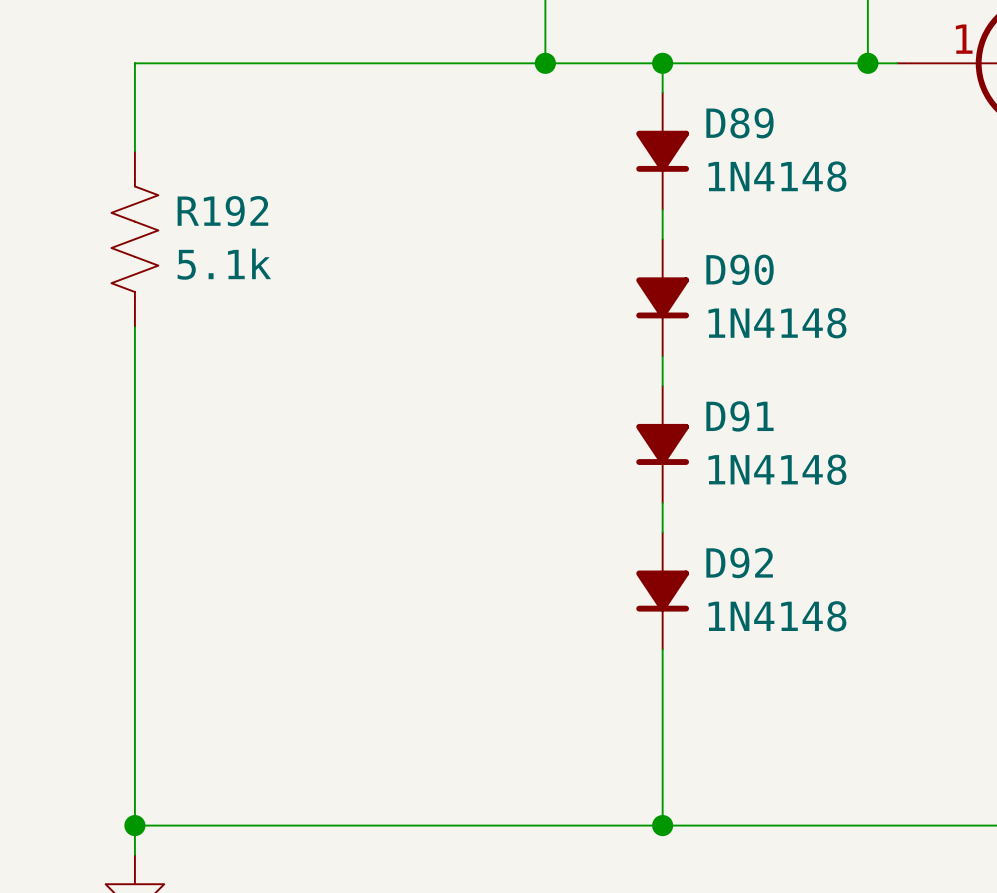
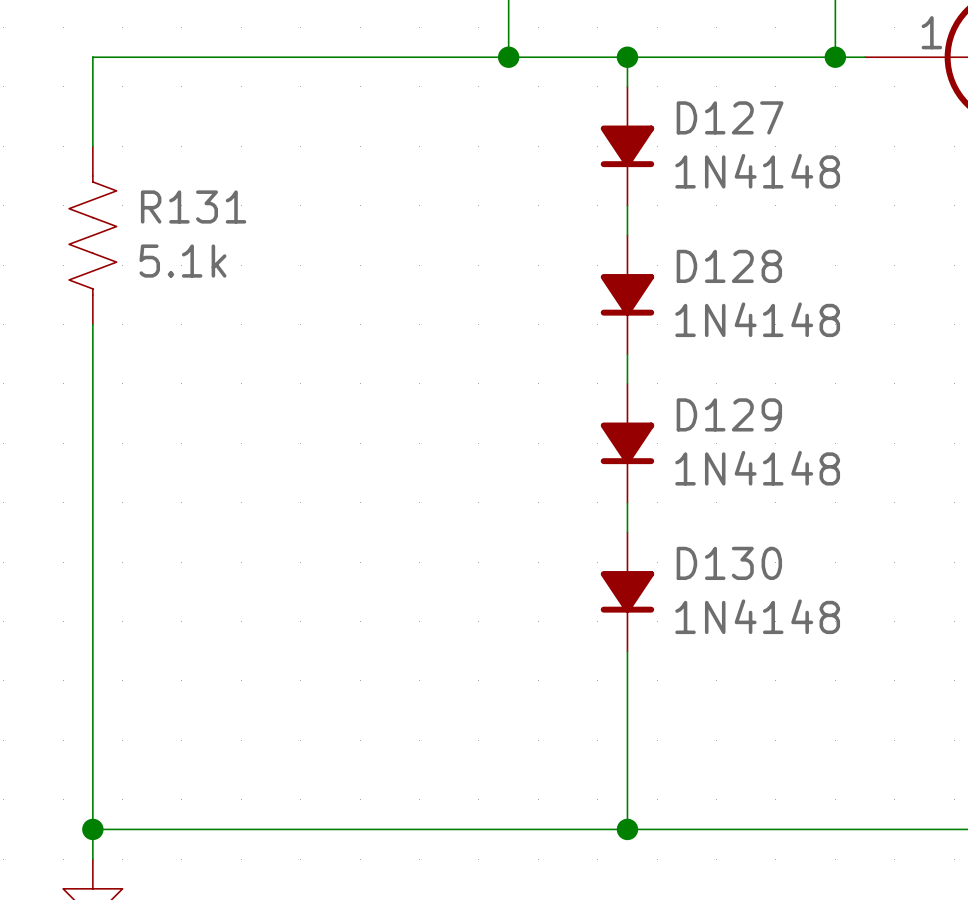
D89 name: D89 (739, 123) -> D127 (730, 117)
R192 name: R192 (222, 211) -> R131 (193, 206)
D90 name: D90 (740, 269) -> D128 (729, 266)
D91 name: D91 (739, 416) -> D129 (729, 414)
D92 name: D92 (739, 562) -> D130 (729, 563)

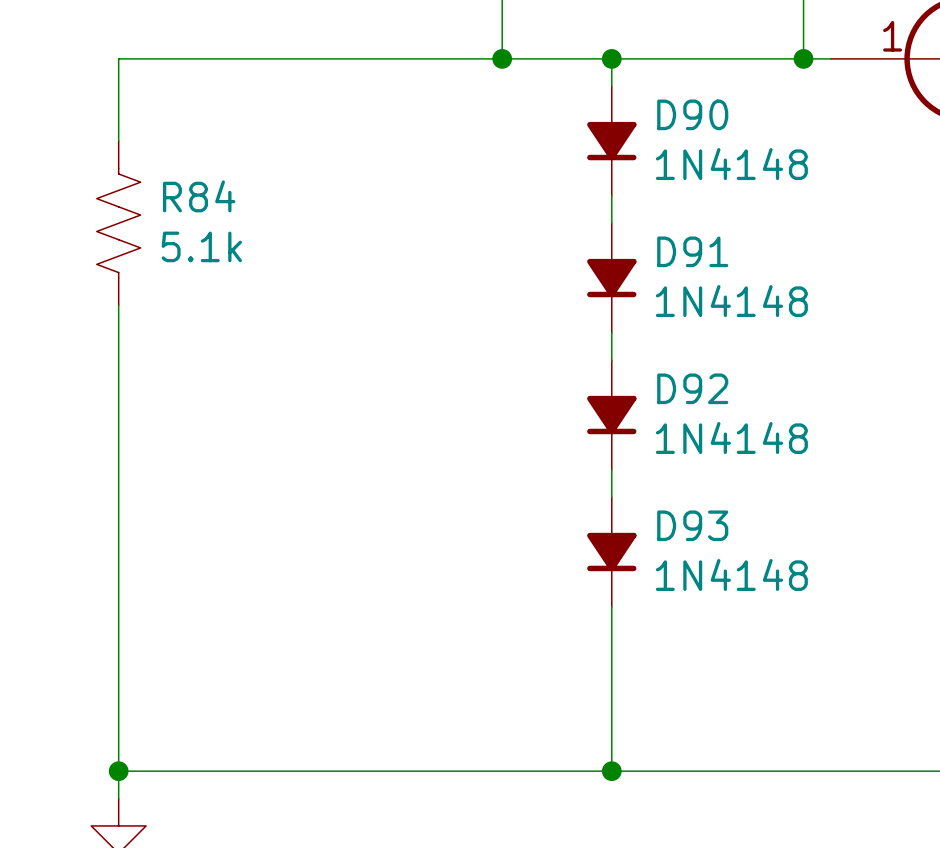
D127 name: D127 (730, 117) -> D90 (692, 114)
R131 name: R131 (193, 206) -> R84 (199, 196)
D128 name: D128 (729, 266) -> D91 (692, 251)
D129 name: D129 (729, 414) -> D92 (692, 388)
D130 name: D130 (729, 563) -> D93 (692, 525)

